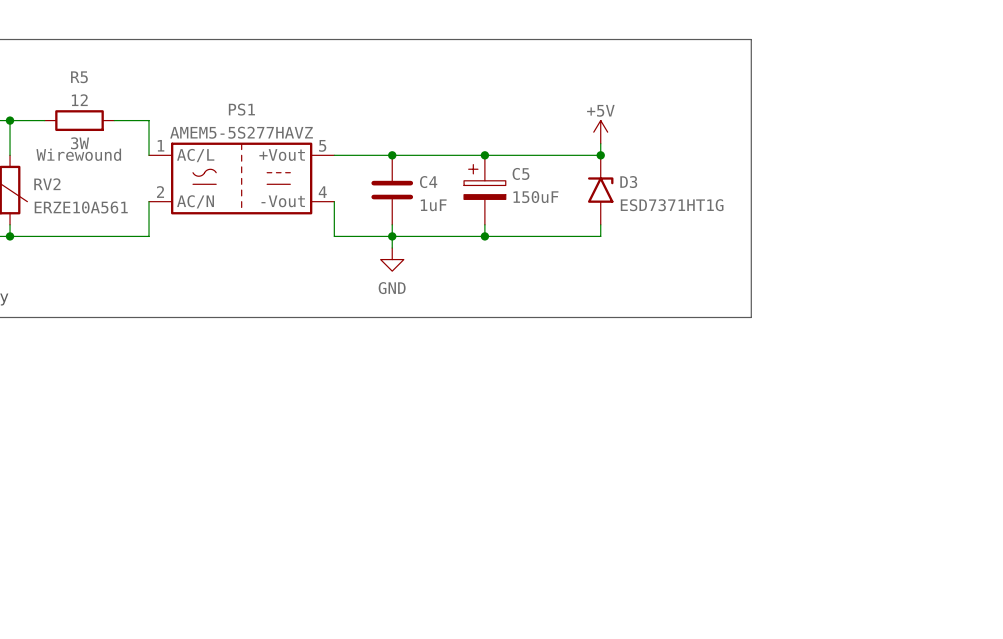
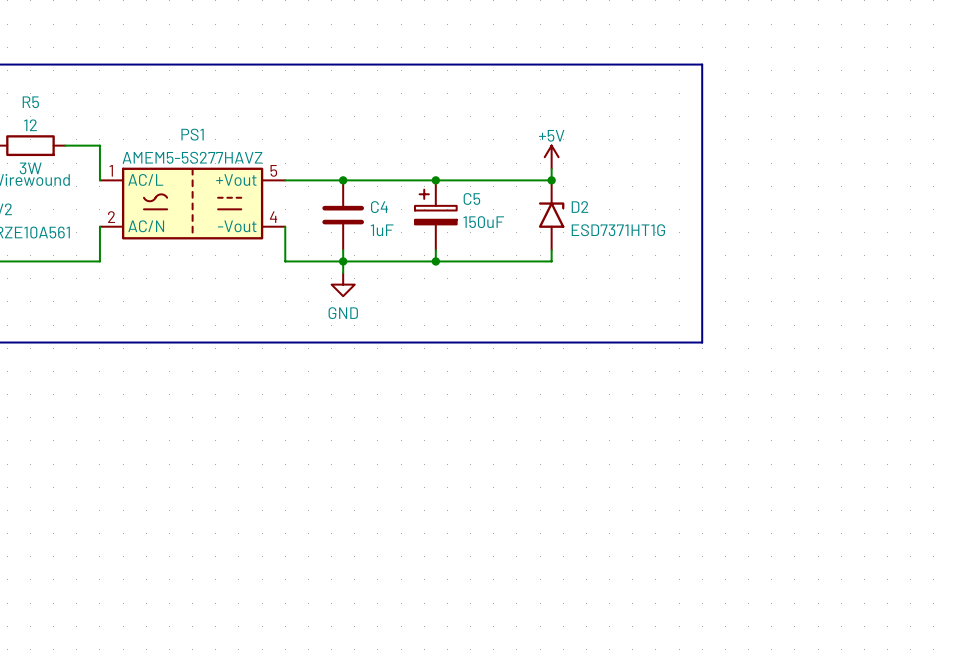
D3 name: D3 (628, 182) -> D2 (580, 207)

